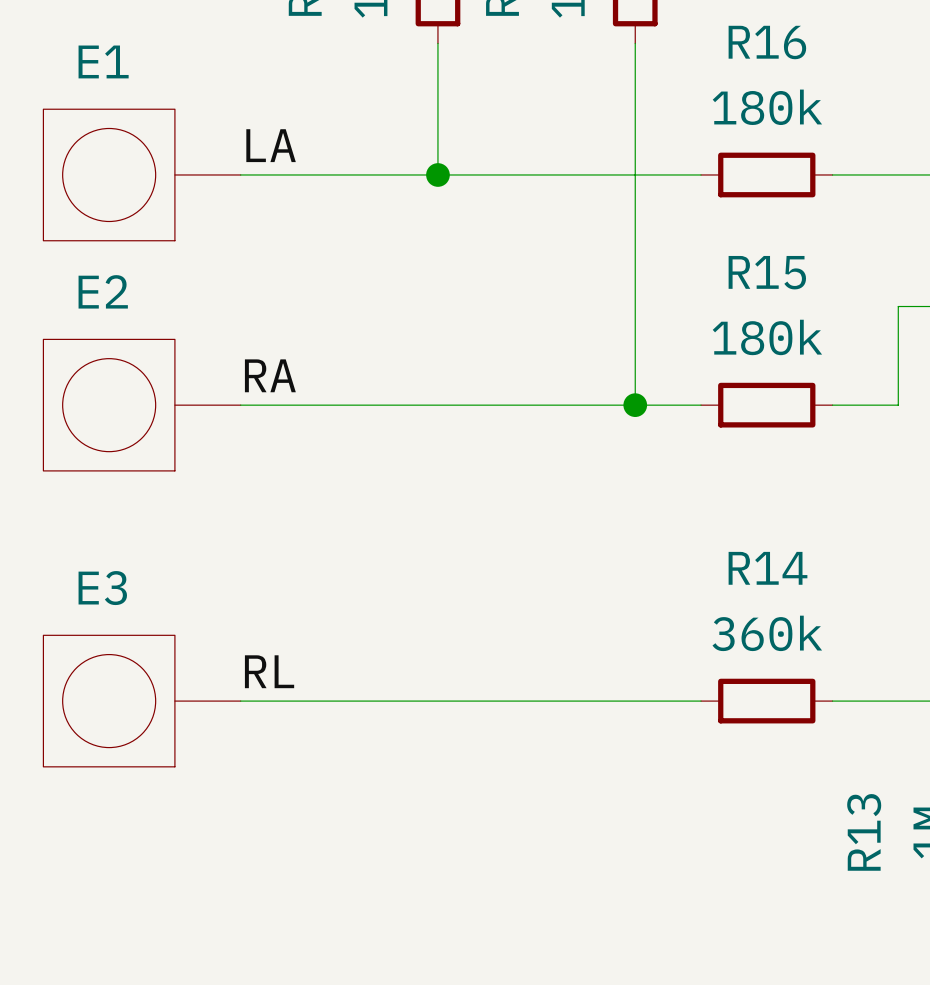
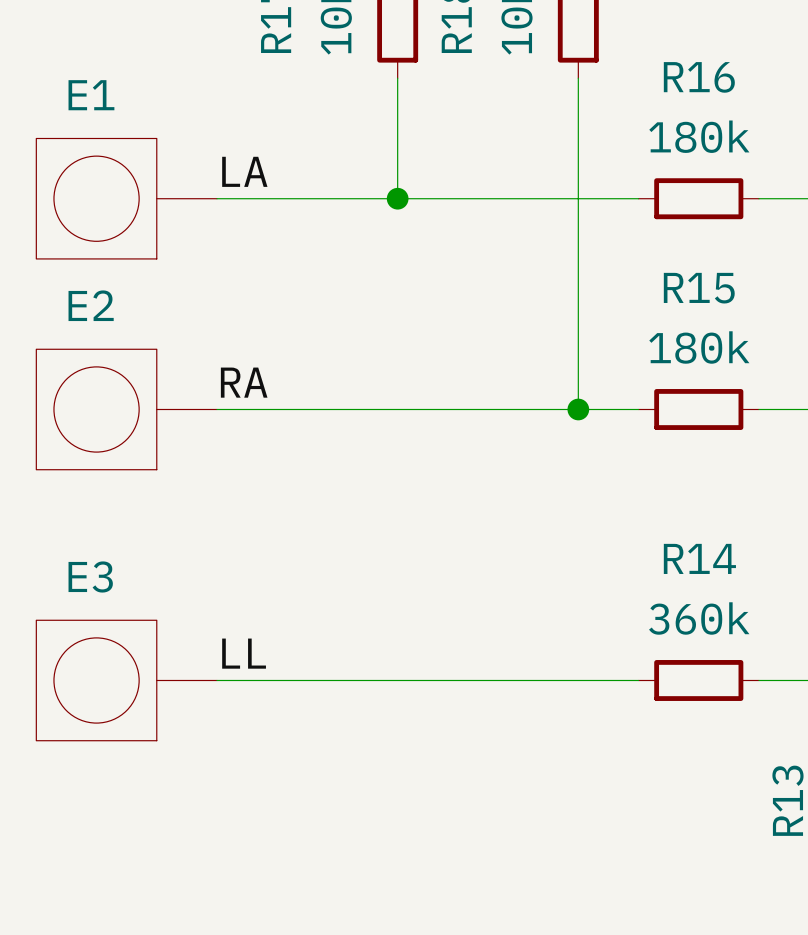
label: RL (269, 671) -> LL (244, 653)

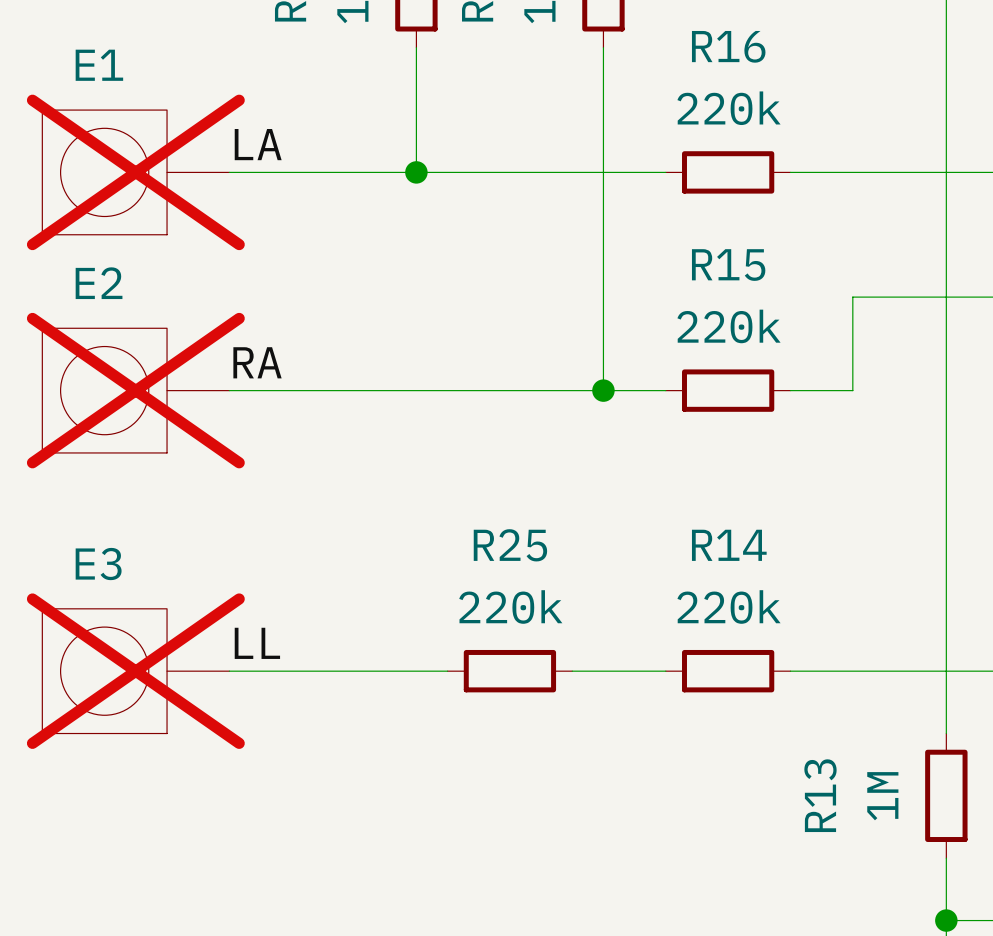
R16 value: 180k (699, 136) -> 220k (729, 108)
E1 do-not-place cross: none -> (135, 172)
R15 value: 180k (699, 347) -> 220k (729, 326)
E2 do-not-place cross: none -> (135, 390)
R14 value: 360k (699, 618) -> 220k (729, 606)
E3 do-not-place cross: none -> (135, 671)
wire: (427, 680) (548, 680) -> none
R25: none -> 220k (509, 671)

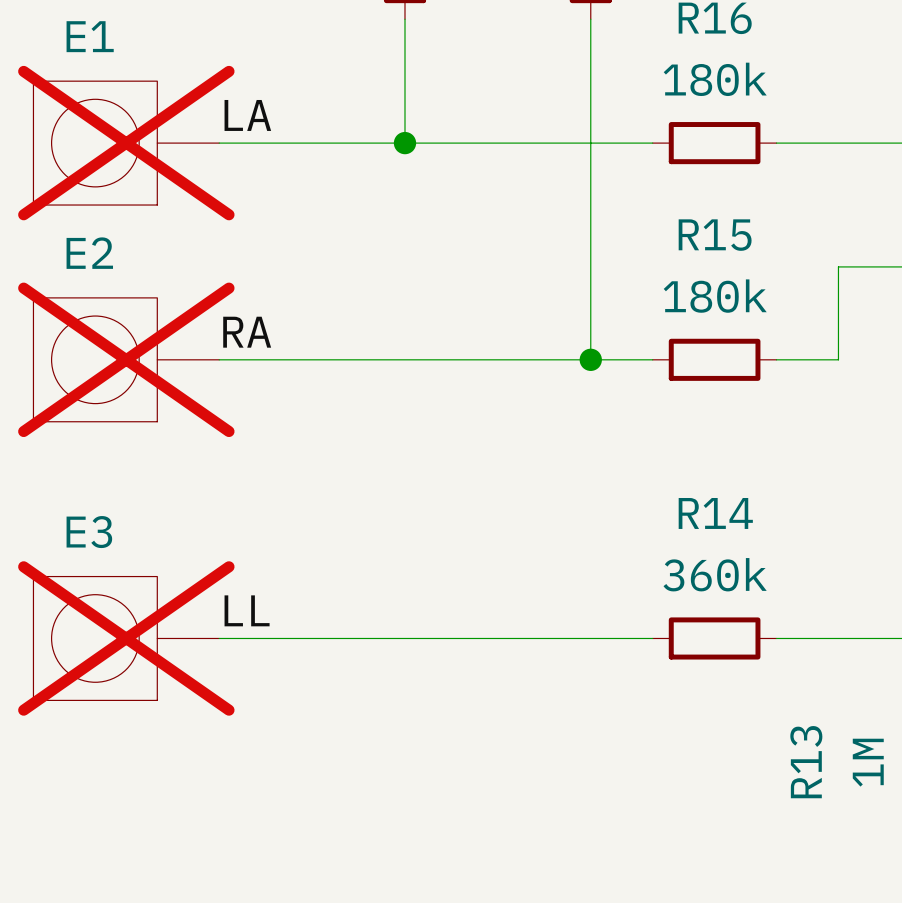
R16 value: 220k (729, 108) -> 180k (715, 79)
R15 value: 220k (729, 326) -> 180k (715, 296)
R14 value: 220k (729, 606) -> 360k (715, 574)
wire: none -> (435, 638) (559, 638)
R25: 220k (509, 671) -> none

